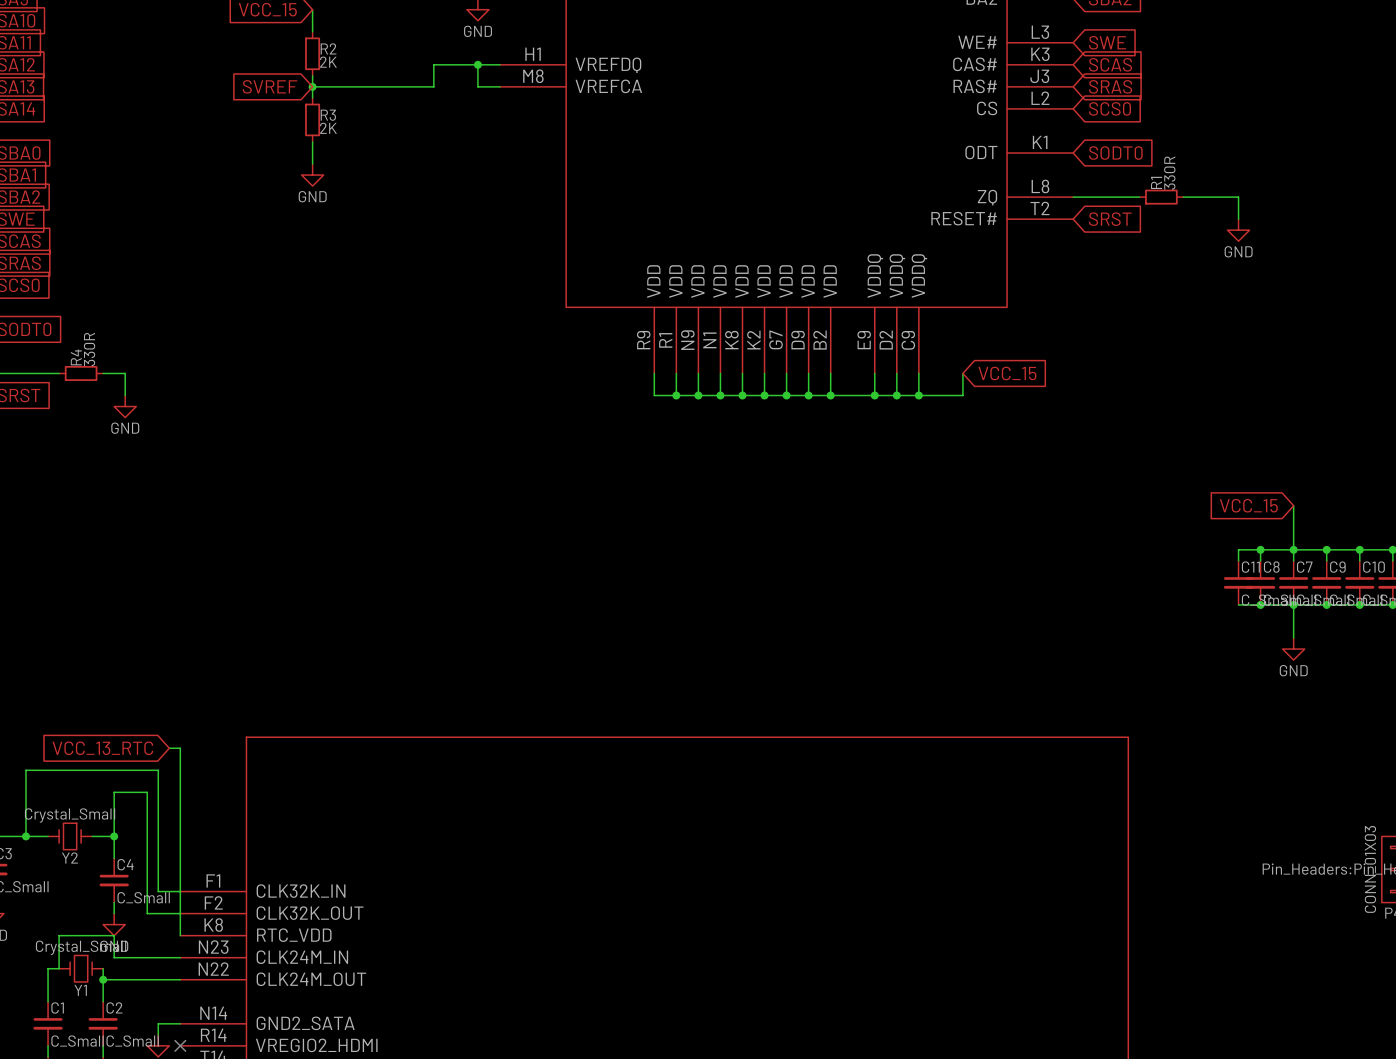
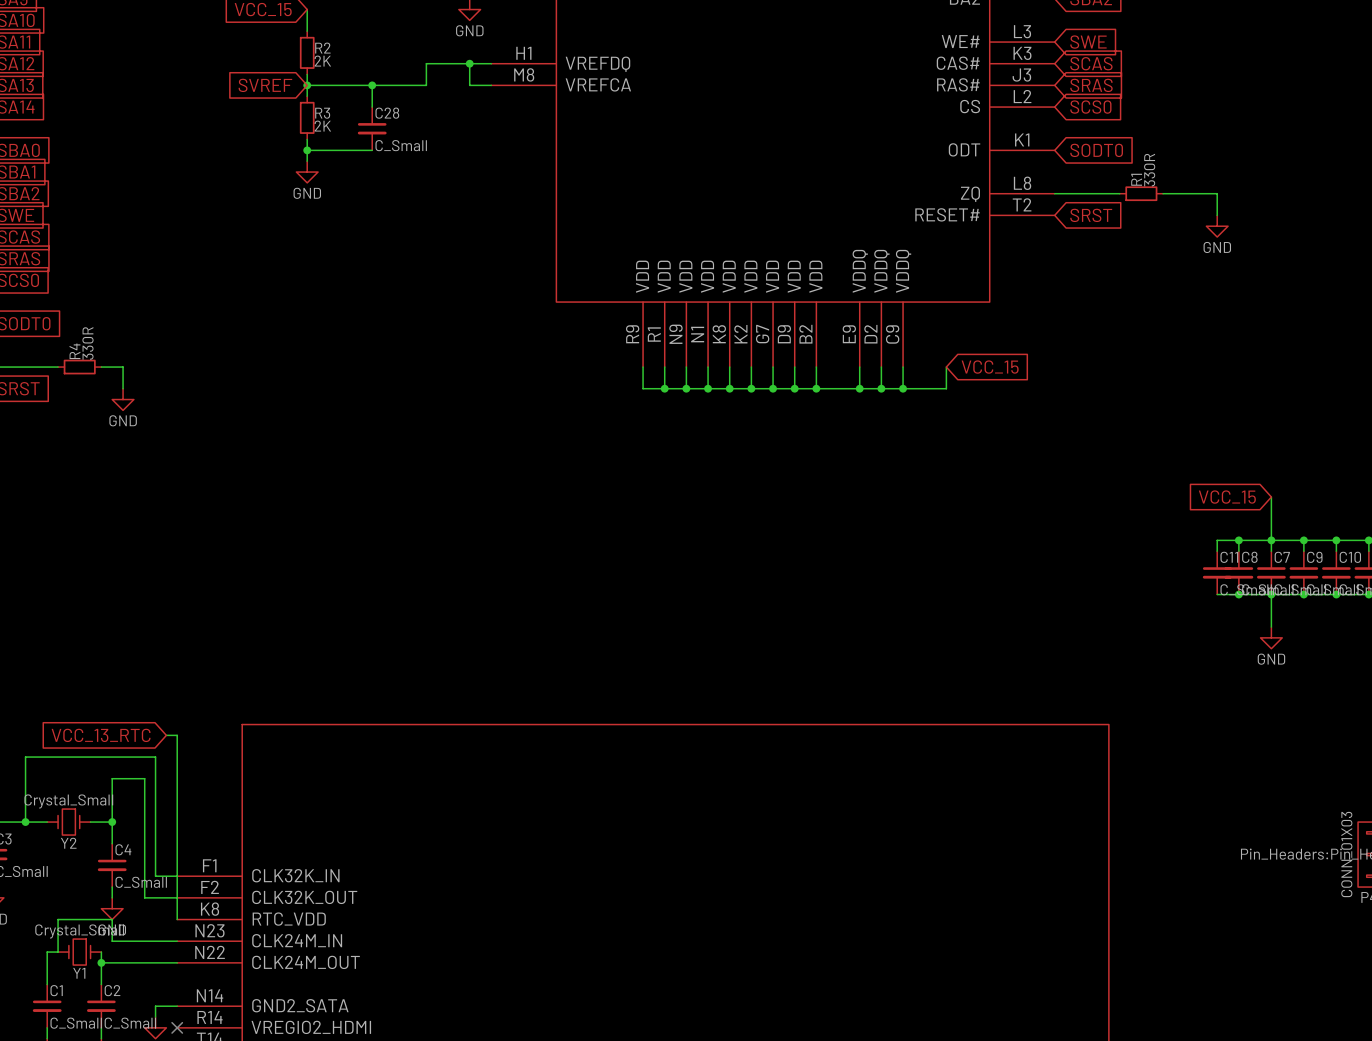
wire: none -> (372, 85) (372, 107)
junction: none -> (372, 85)
C28: none -> C_Small (372, 128)
wire: none -> (307, 150) (372, 150)
junction: none -> (307, 150)

